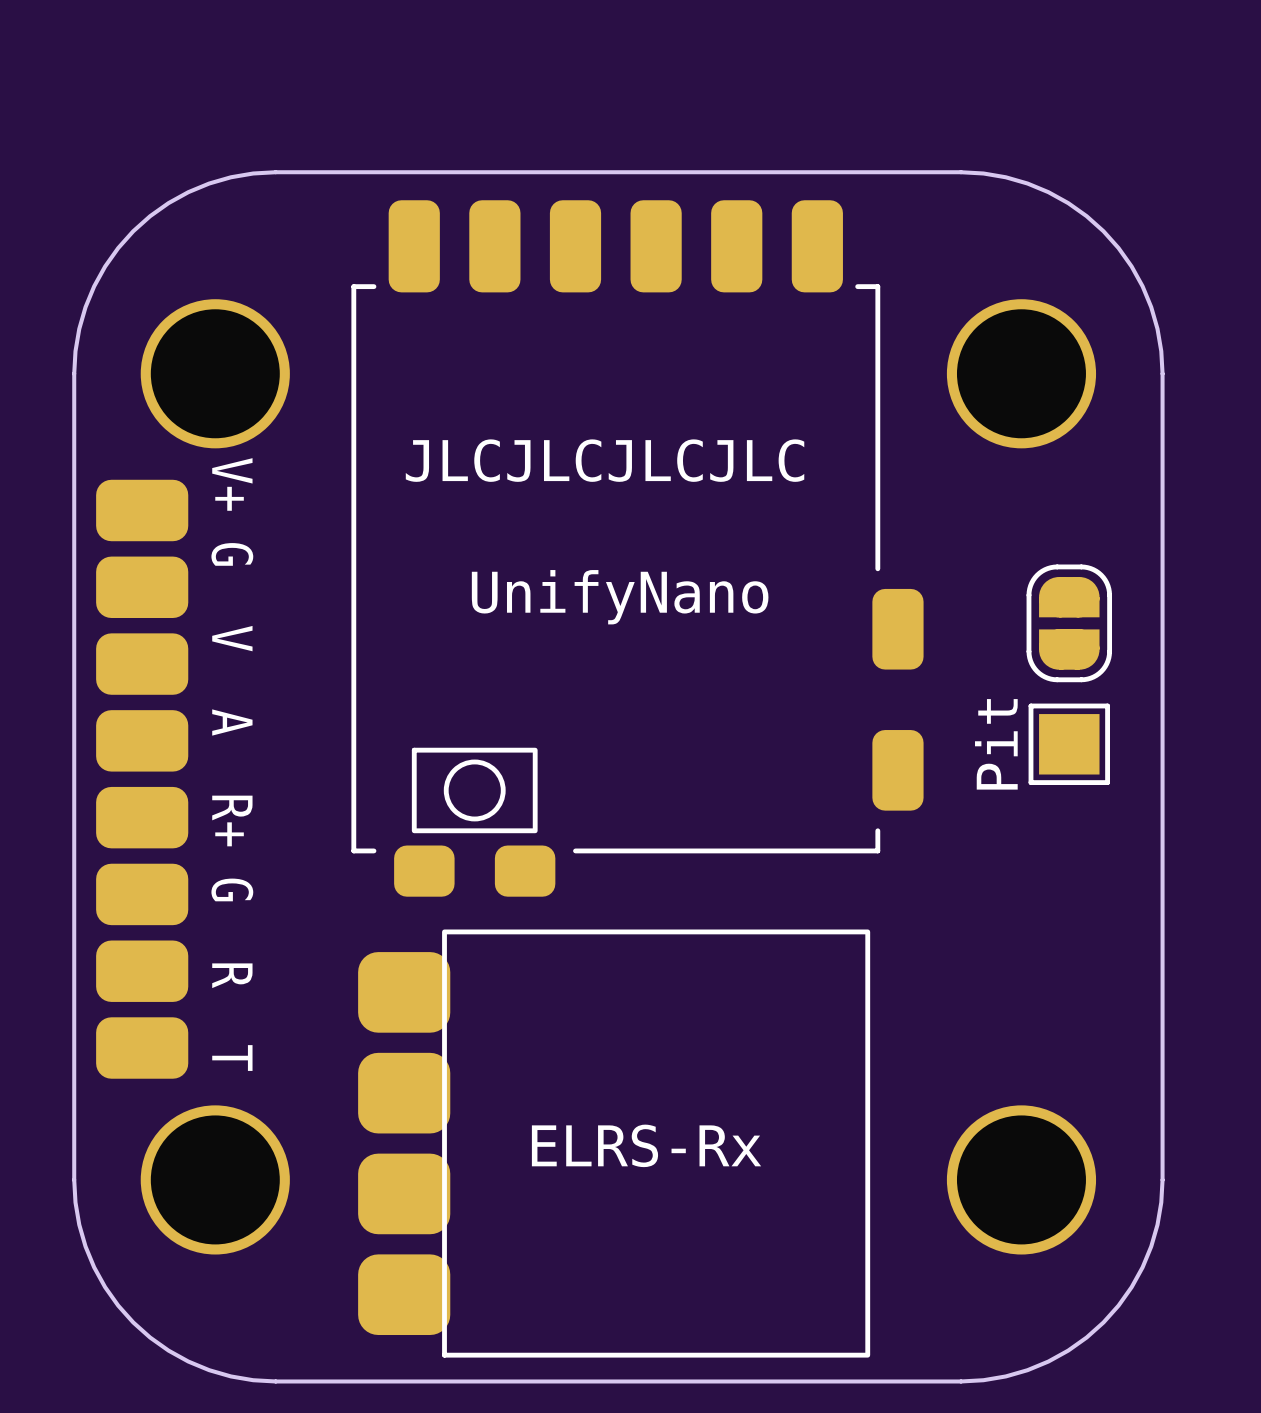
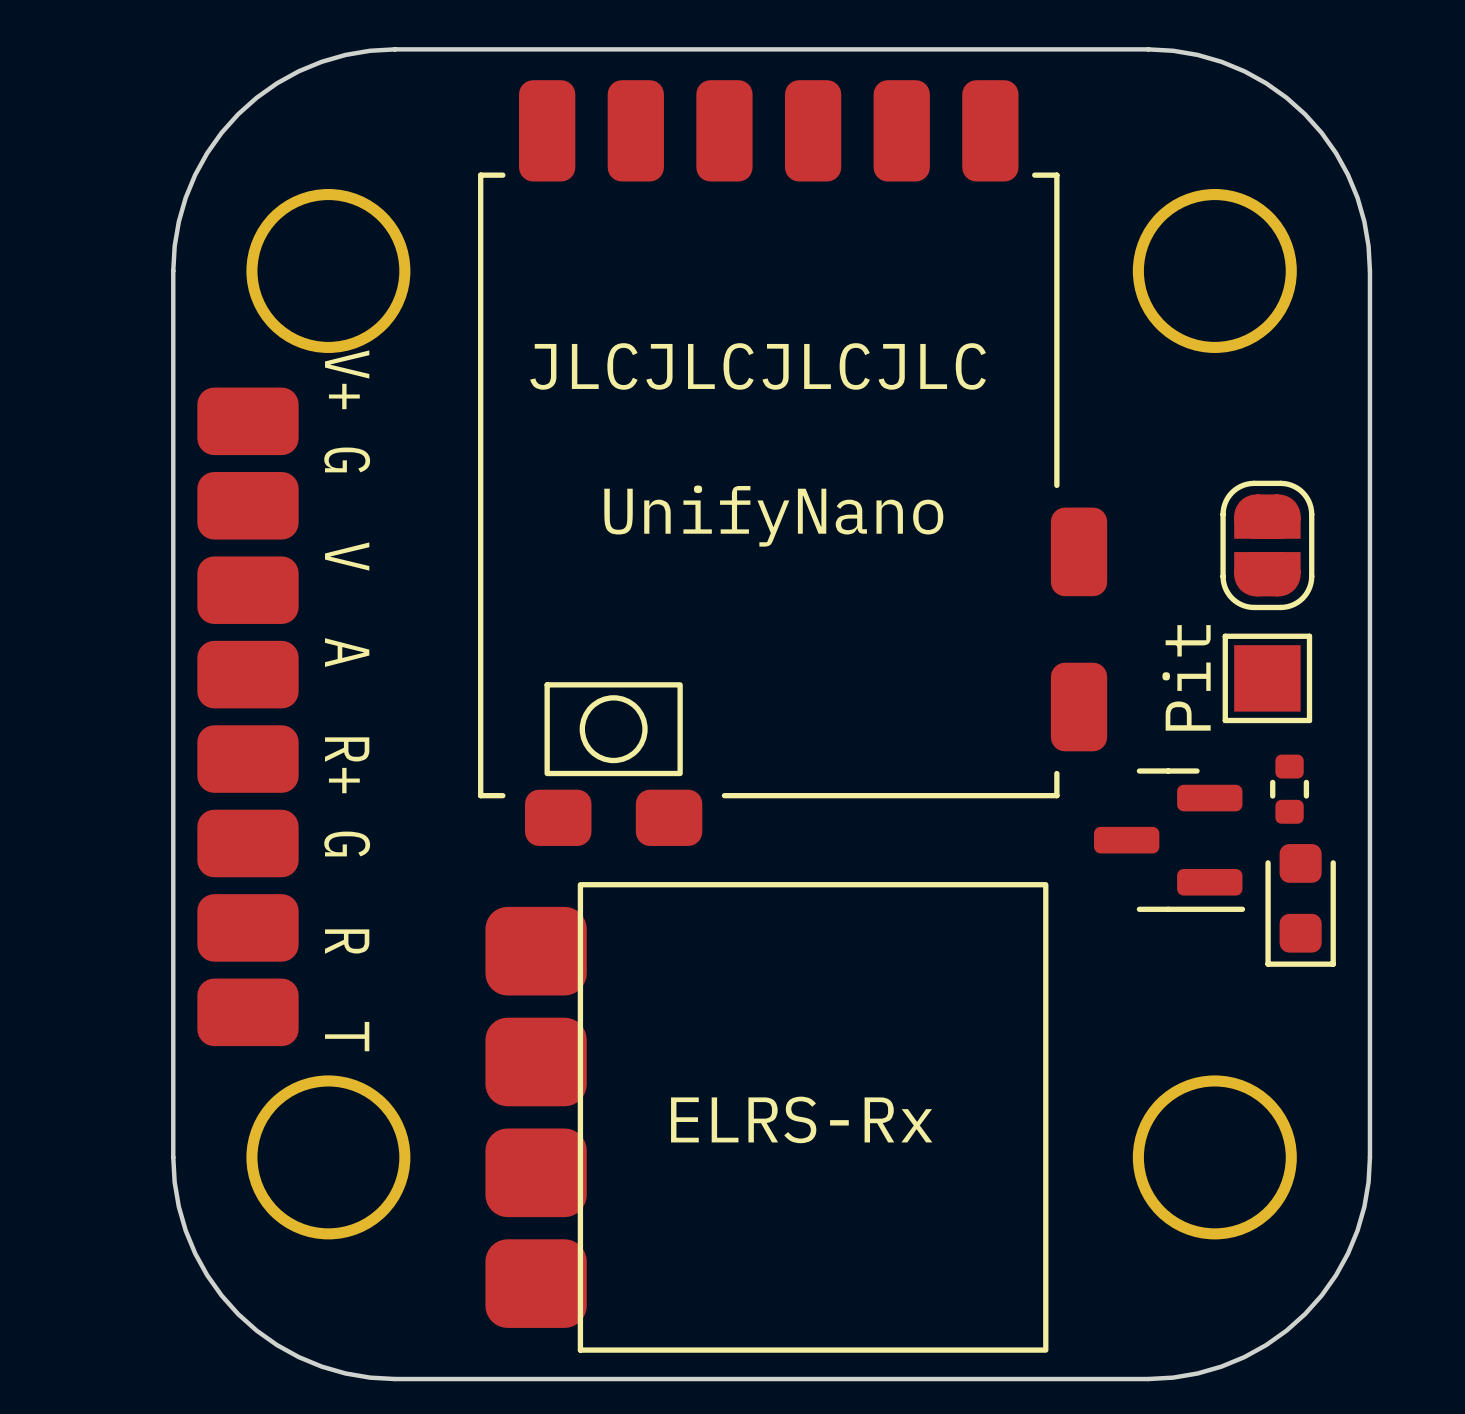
part: none -> (1289, 789)
part: none -> (1169, 840)
part: none -> (1300, 905)

